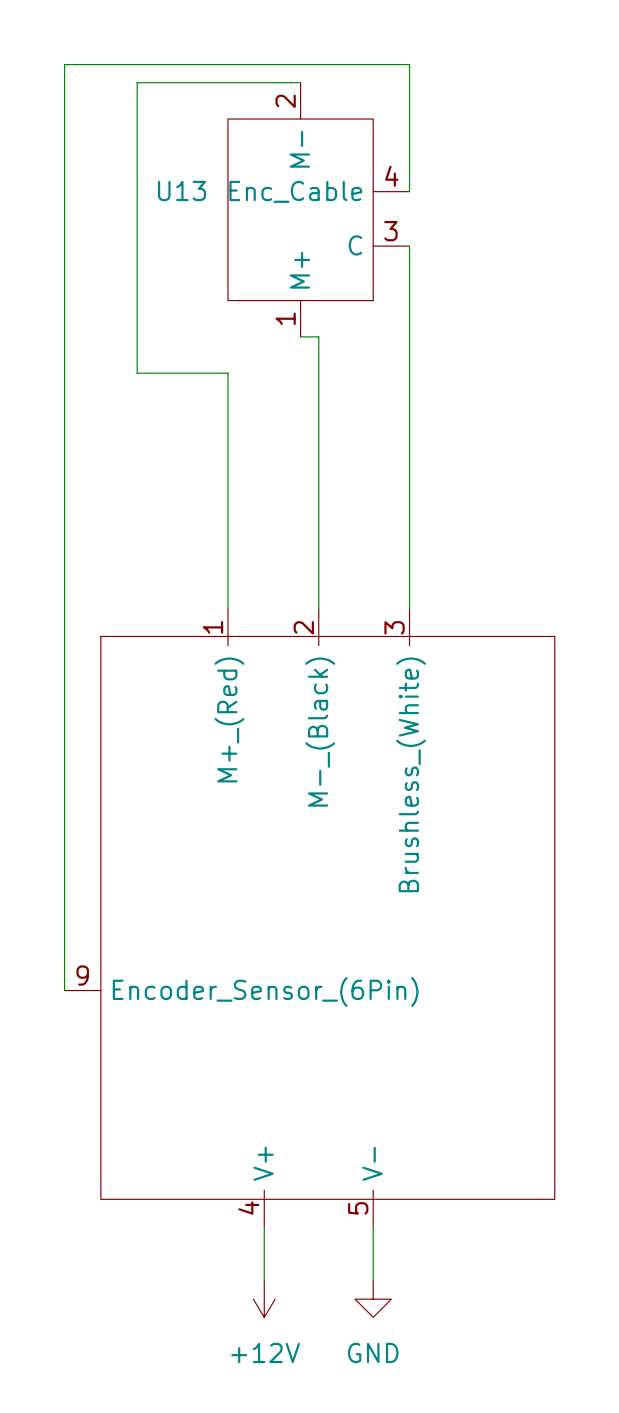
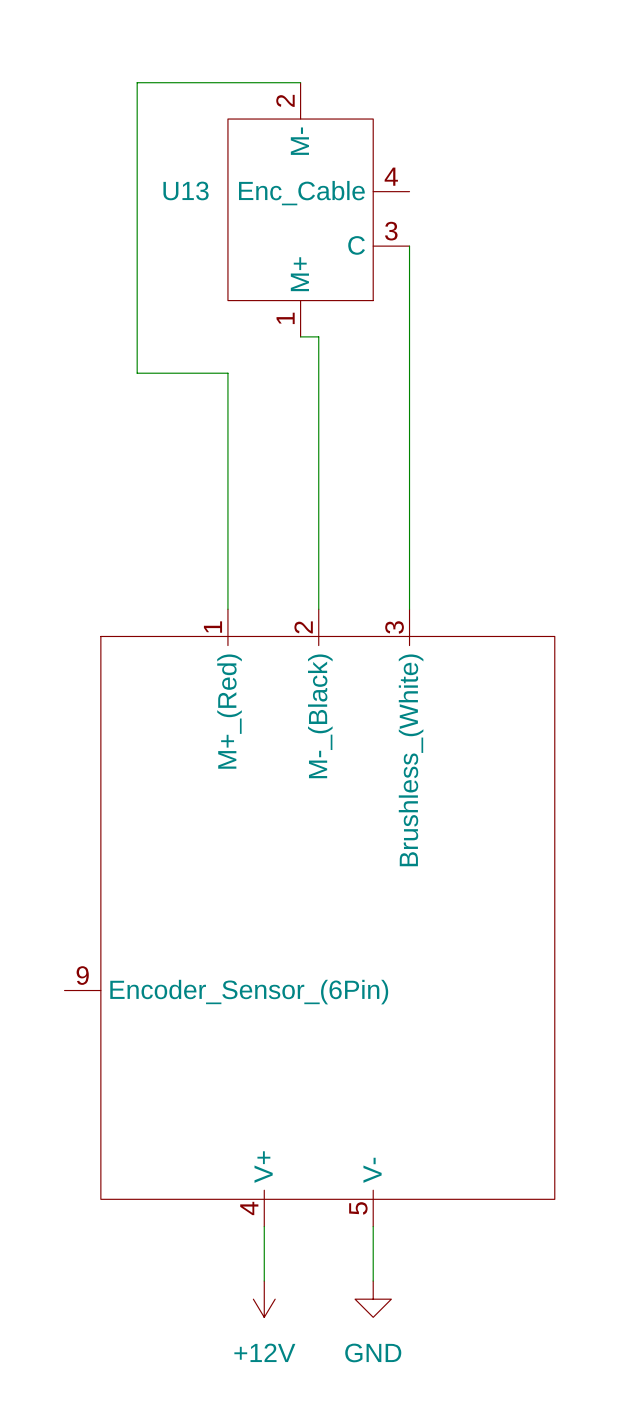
wire: (409, 191) (409, 64) (64, 64) (64, 990) -> none

